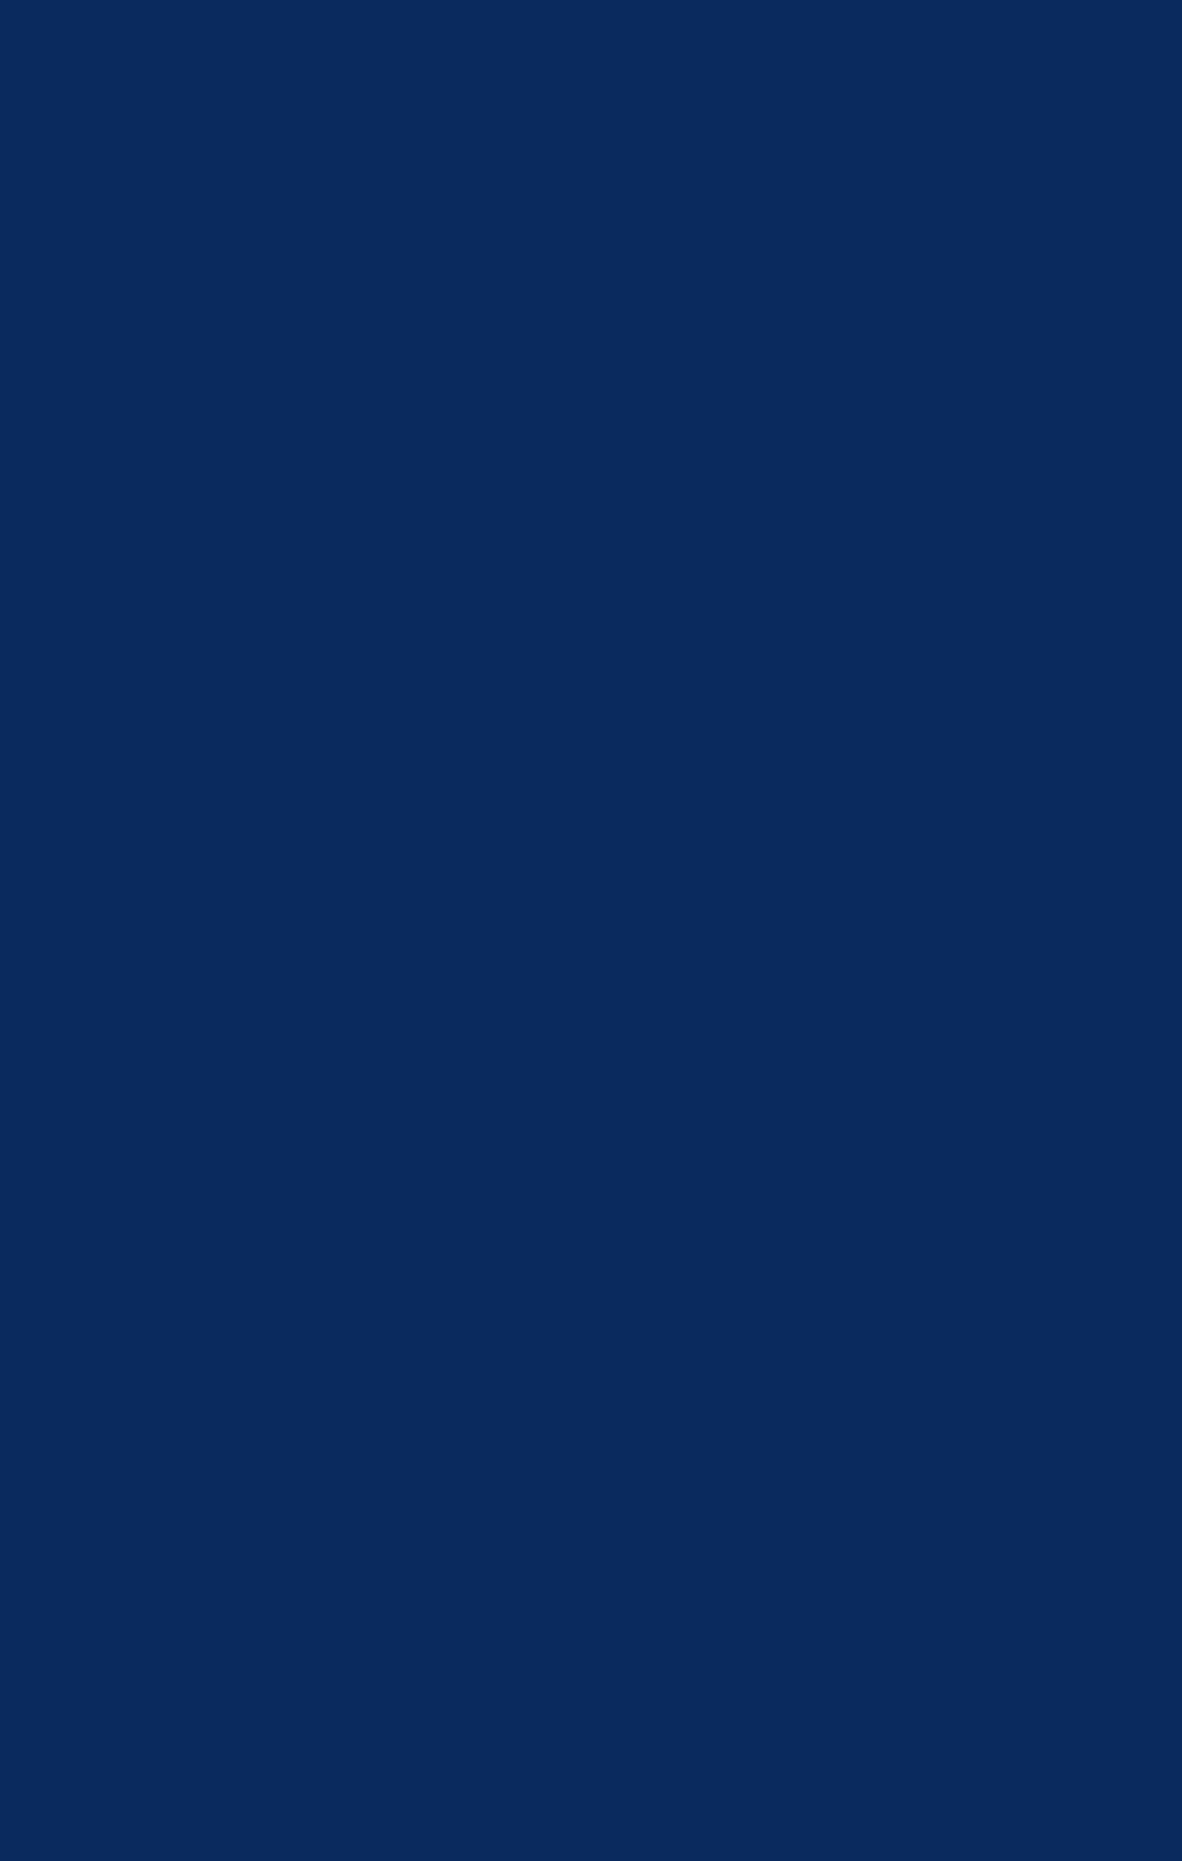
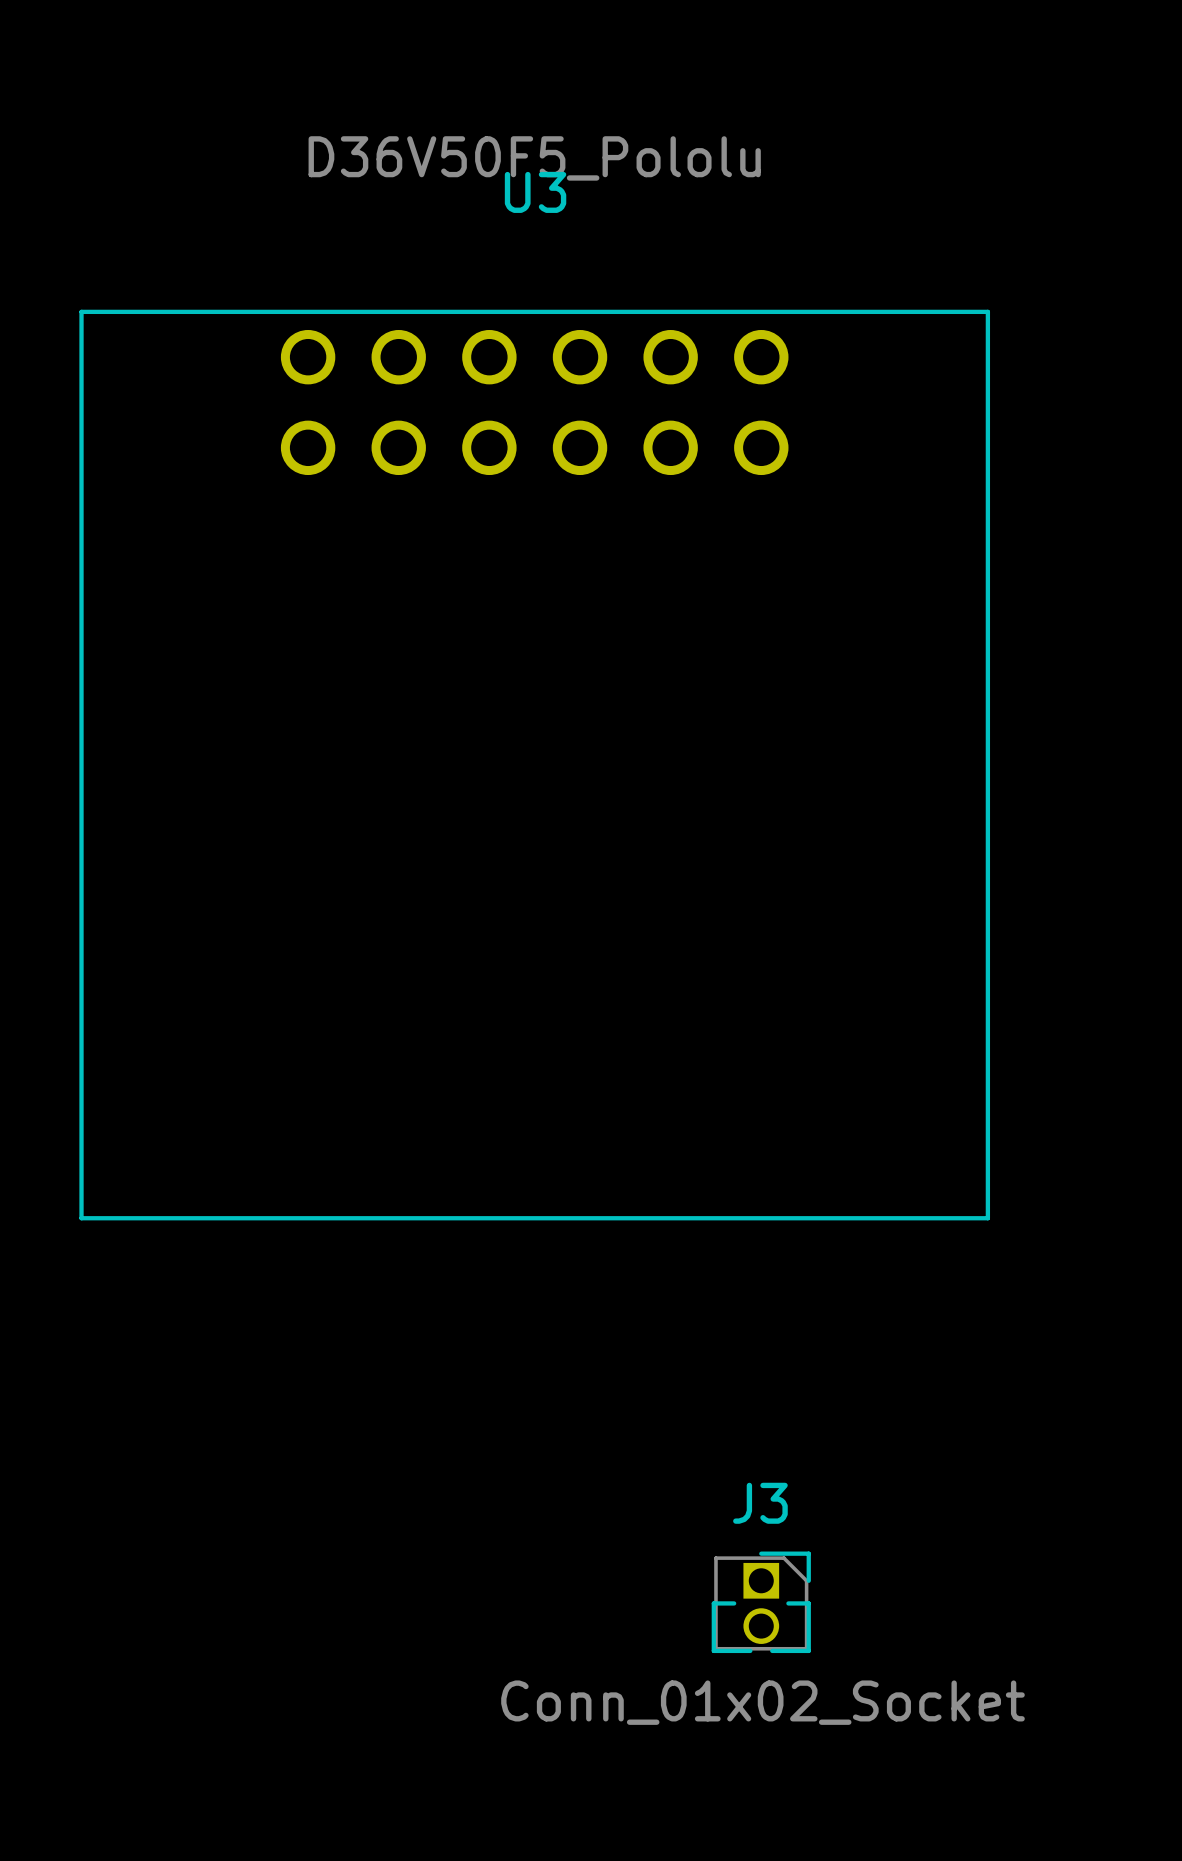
U3: none -> D36V50F5_Pololu (534, 765)
J3: none -> Conn_01x02_Socket (761, 1602)

